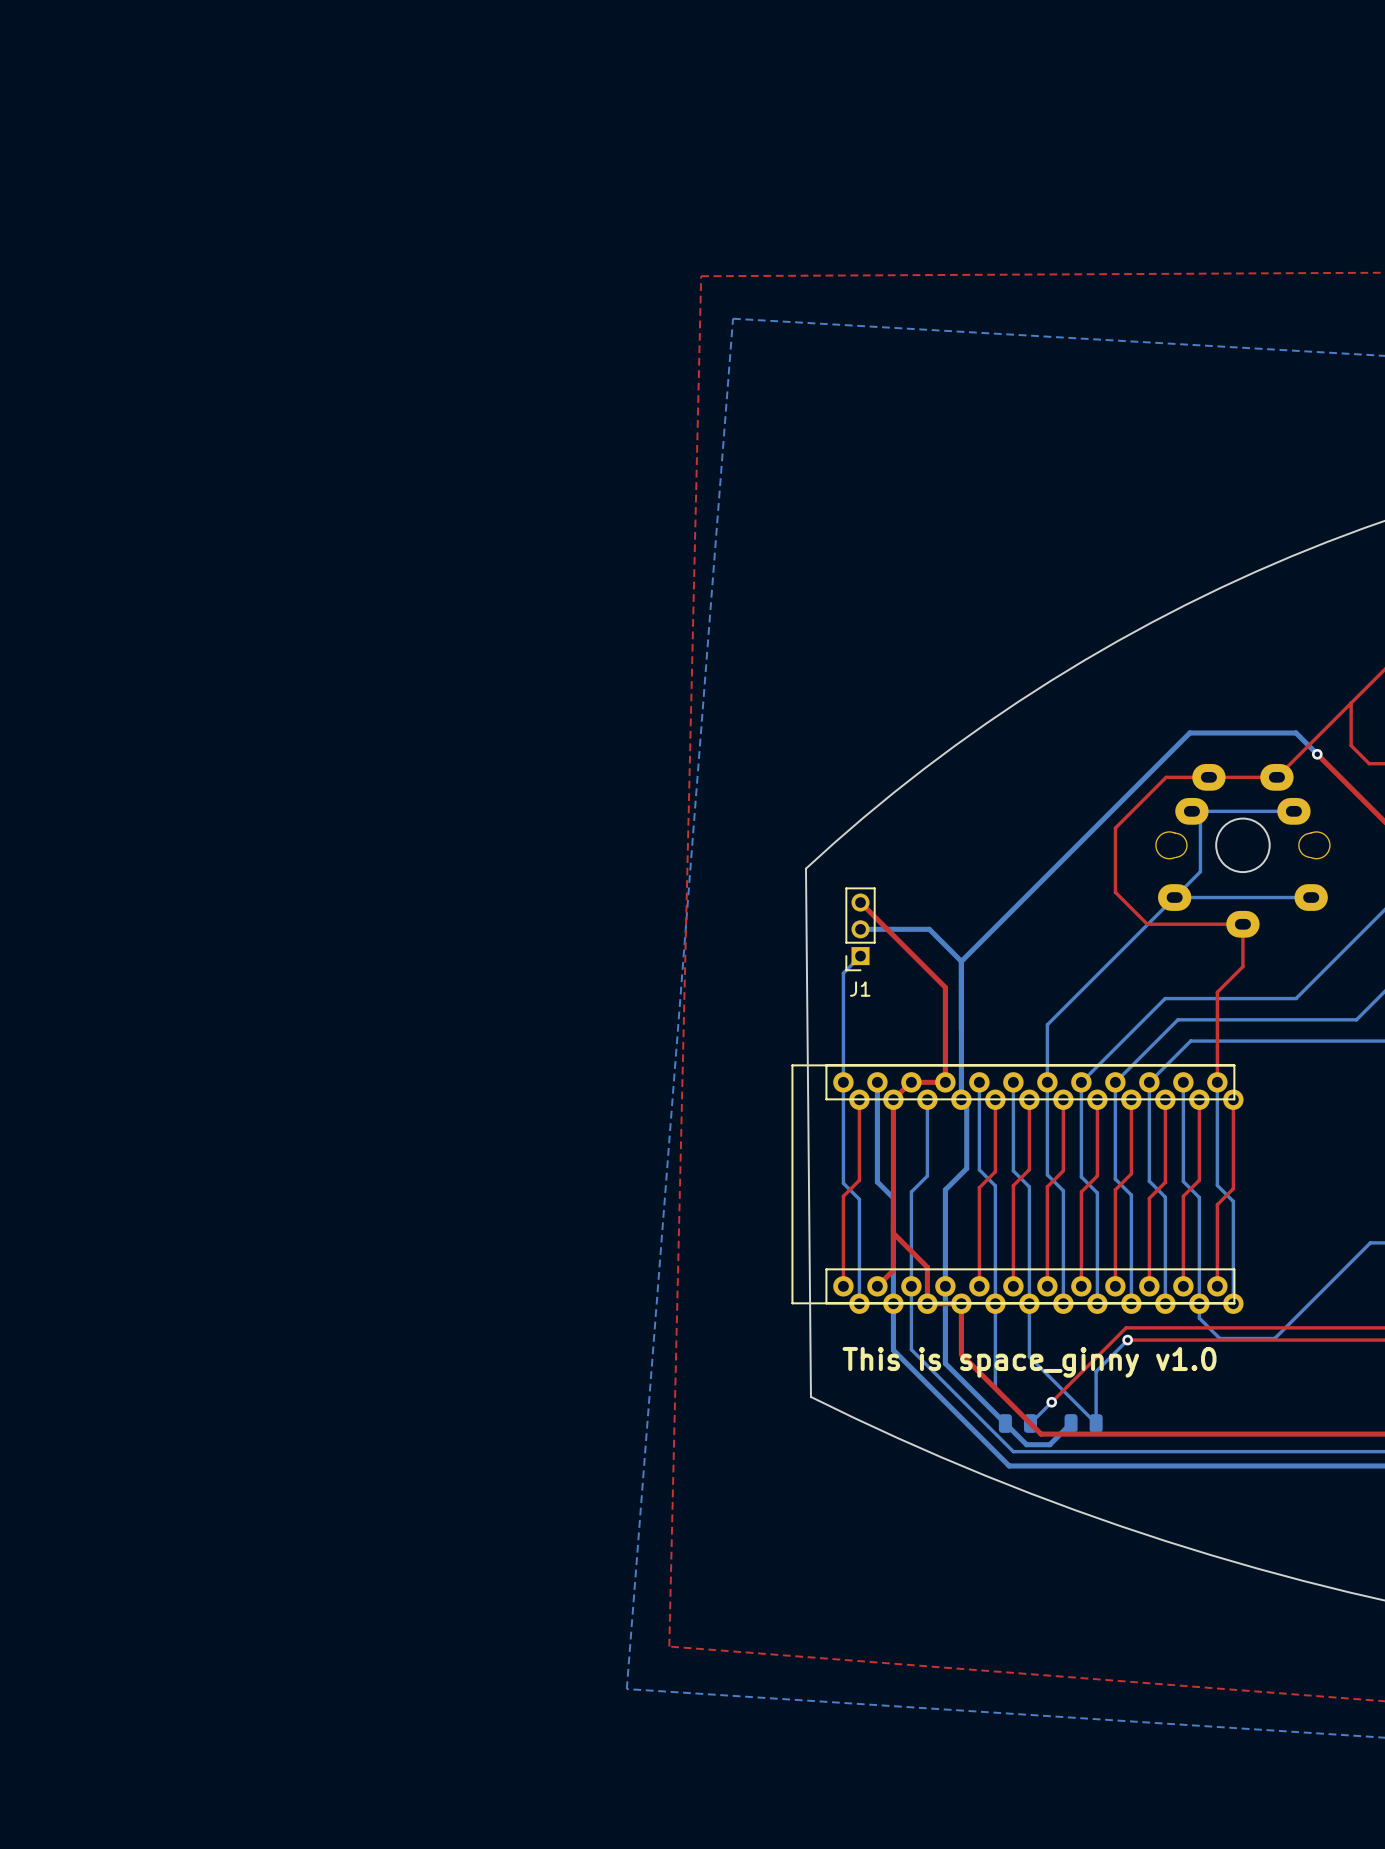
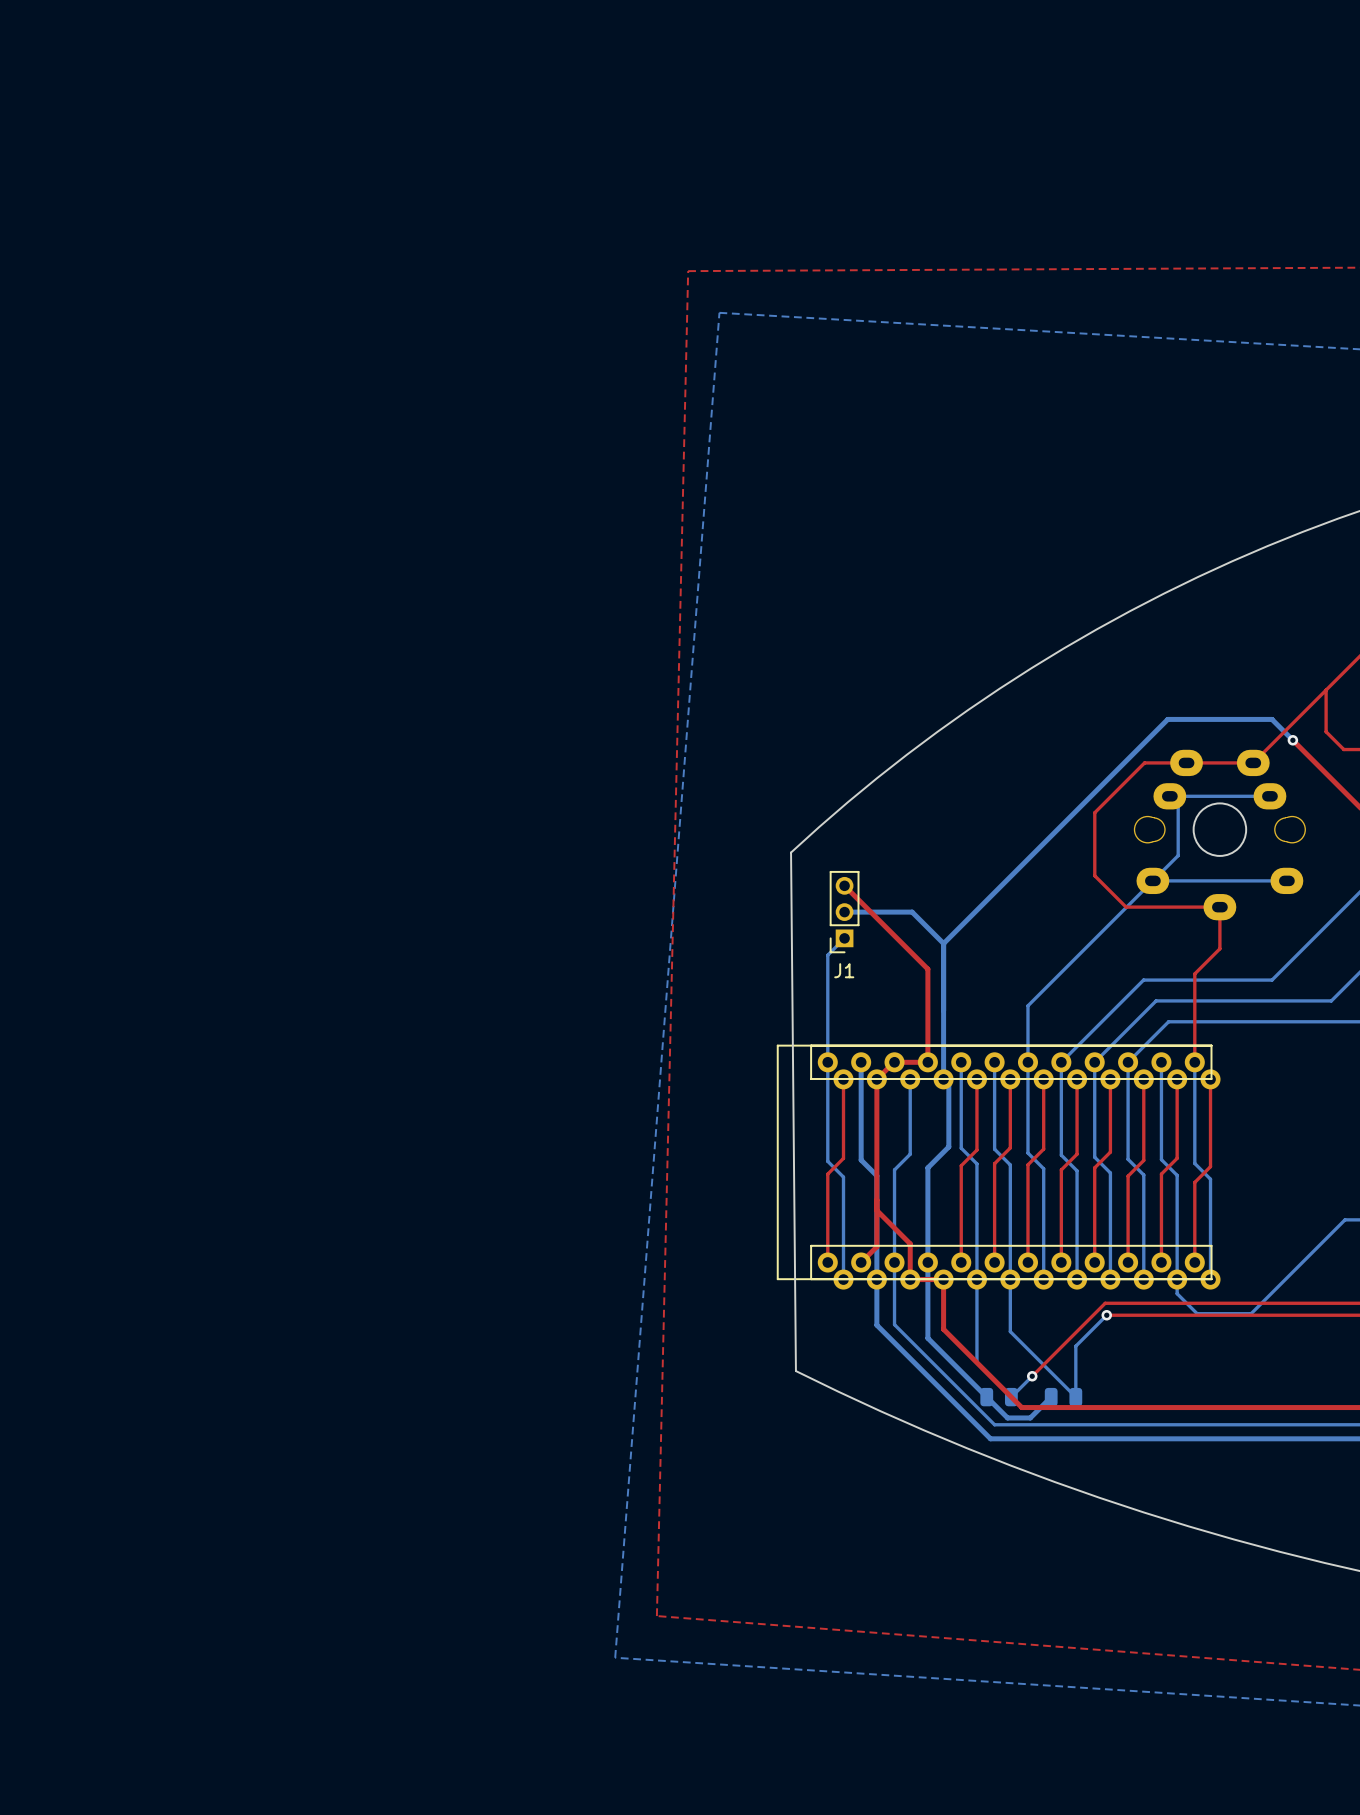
text: This is space_ginny v1.0 (1029, 1362) -> none

